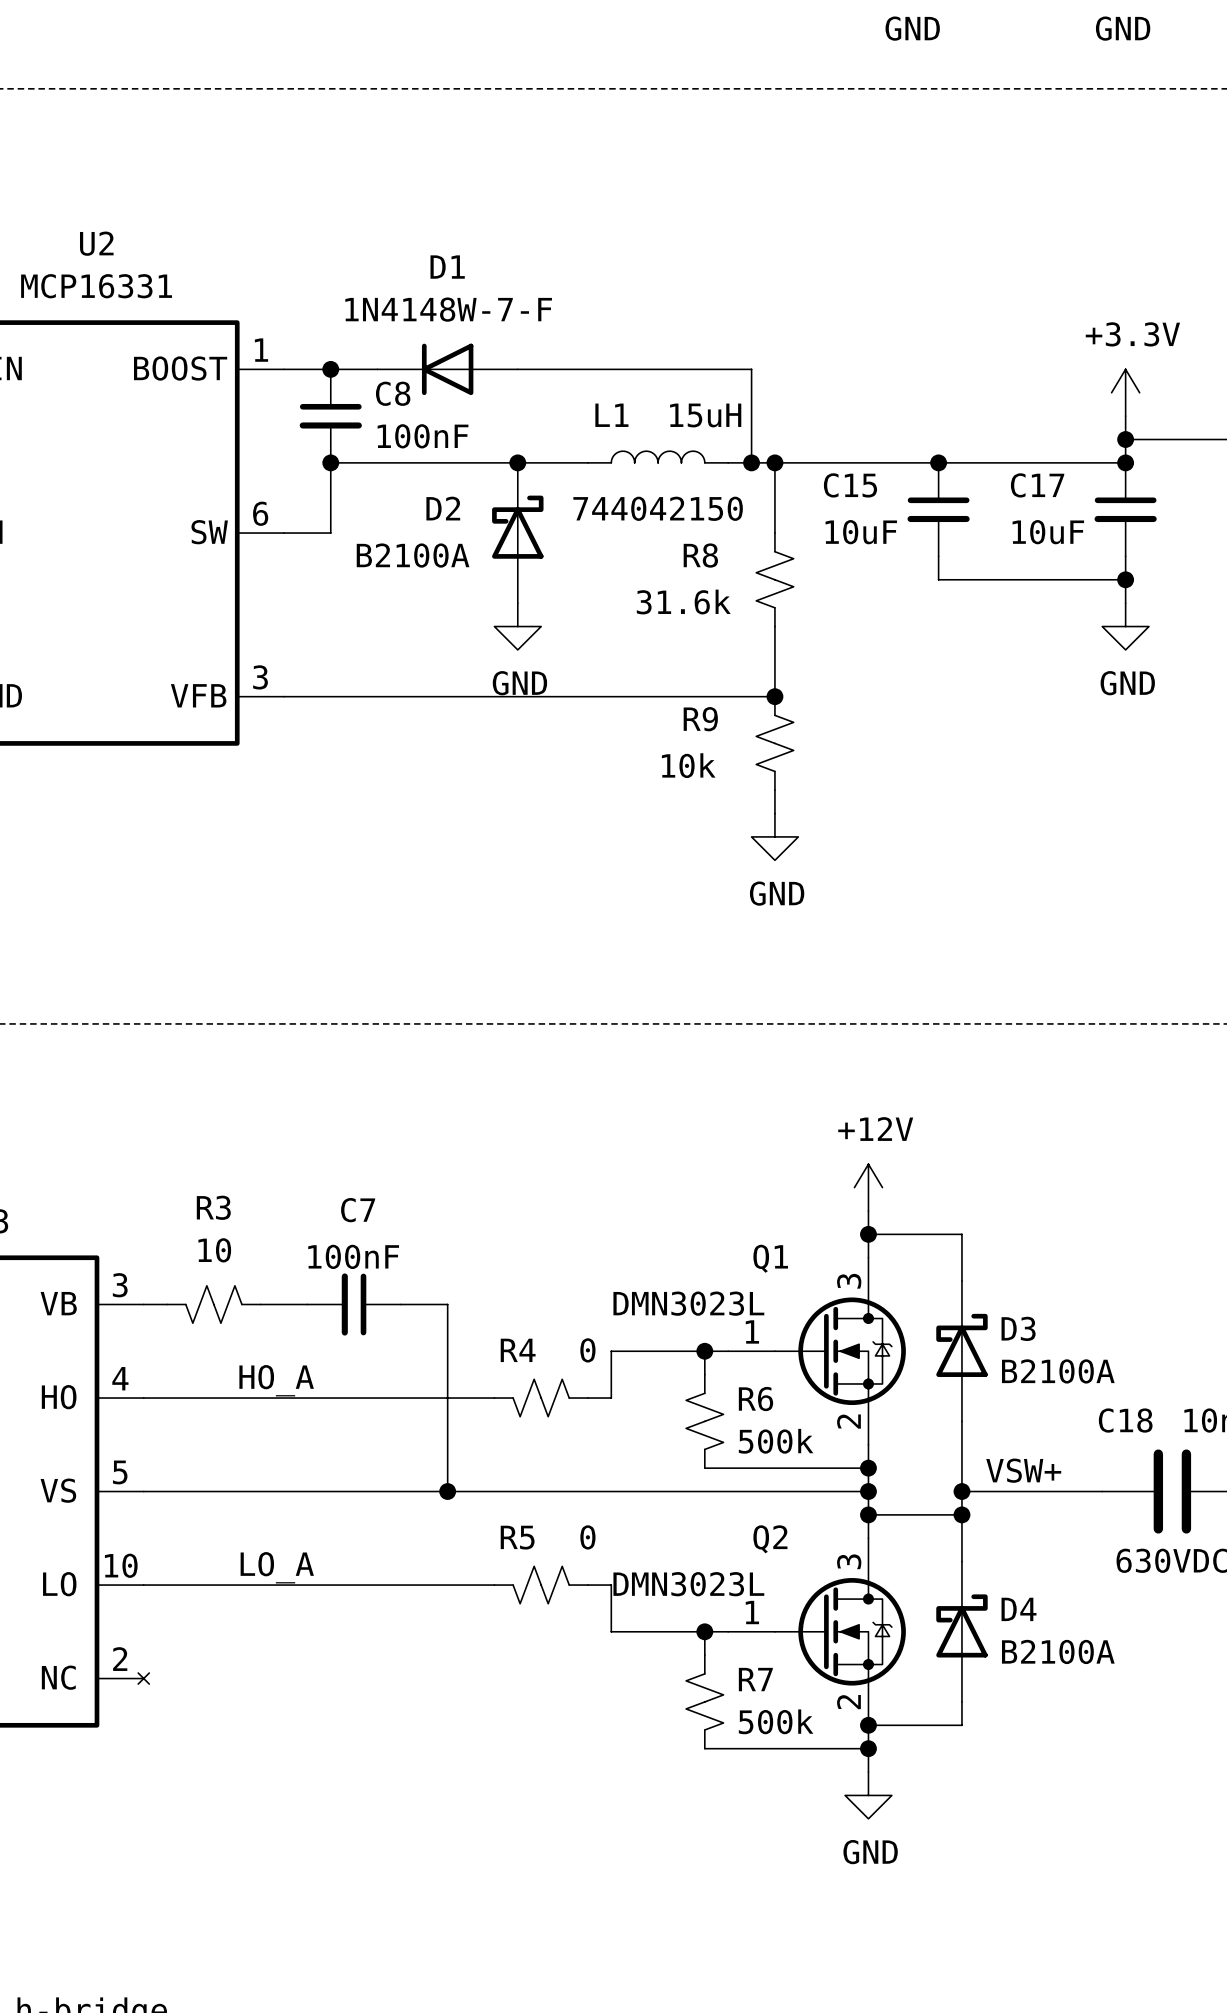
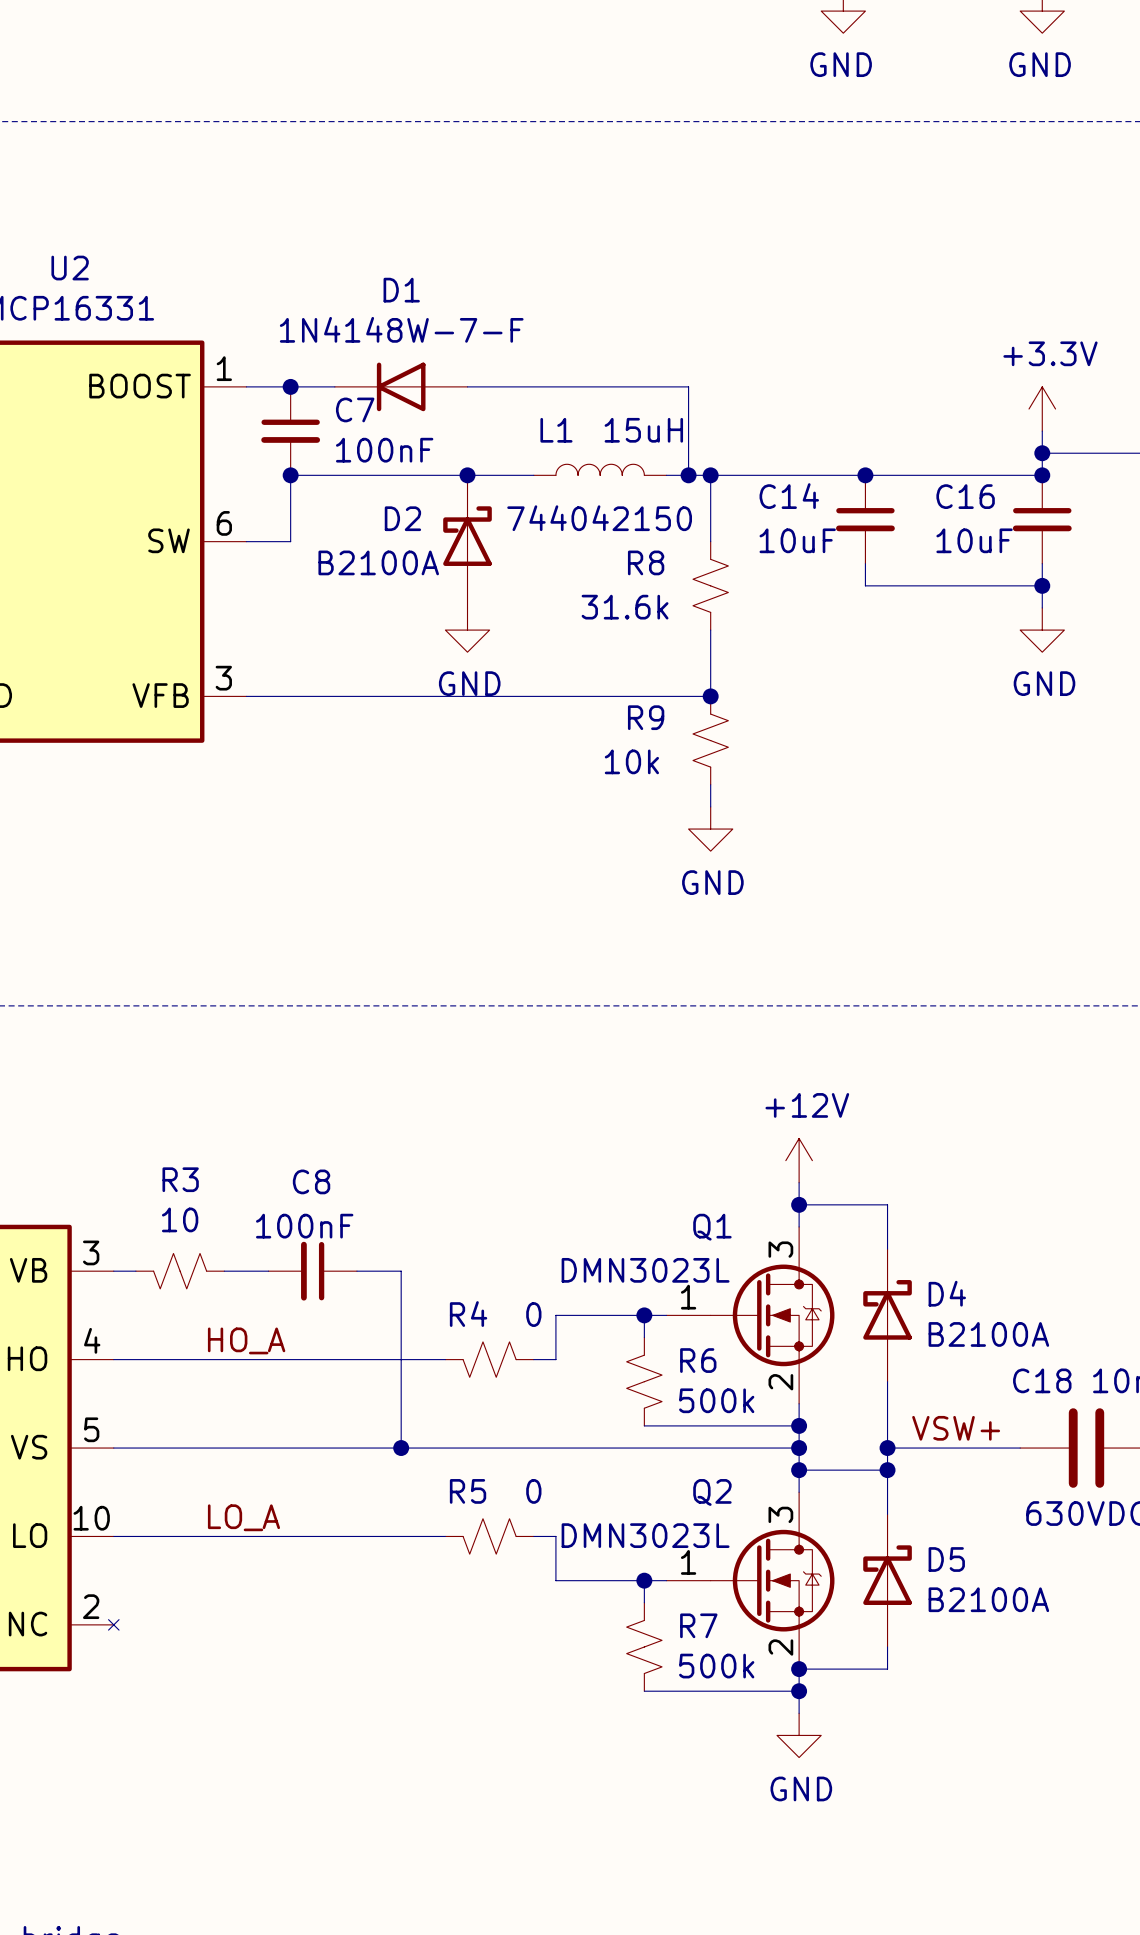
C8 name: C8 (393, 393) -> C7 (355, 409)
C15 name: C15 (850, 485) -> C14 (789, 496)
C17 name: C17 (1037, 485) -> C16 (965, 496)
C7 name: C7 (358, 1210) -> C8 (311, 1181)
D3 name: D3 (1018, 1328) -> D4 (947, 1293)
D4 name: D4 (1018, 1609) -> D5 (946, 1559)

